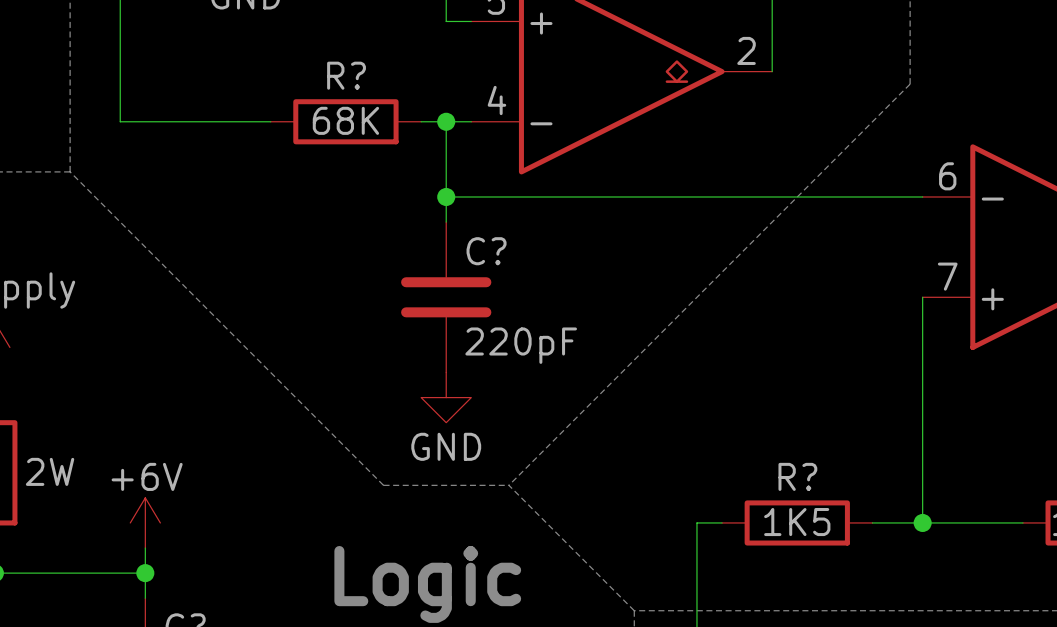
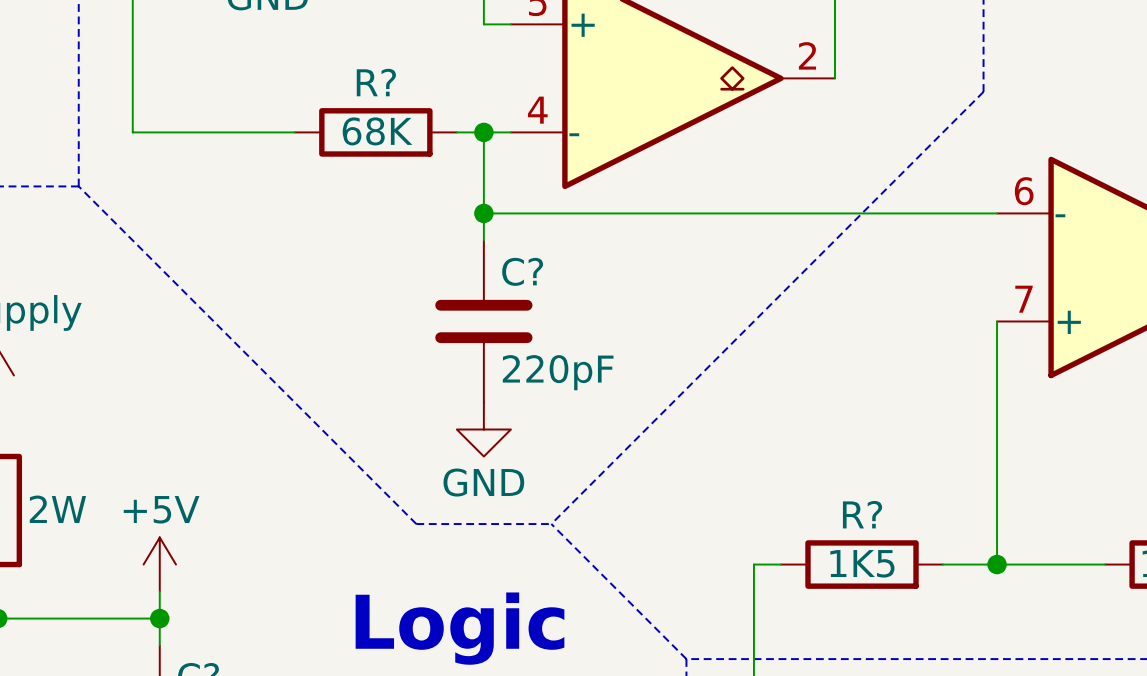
power symbol: +6V (145, 522) -> +5V (159, 564)

